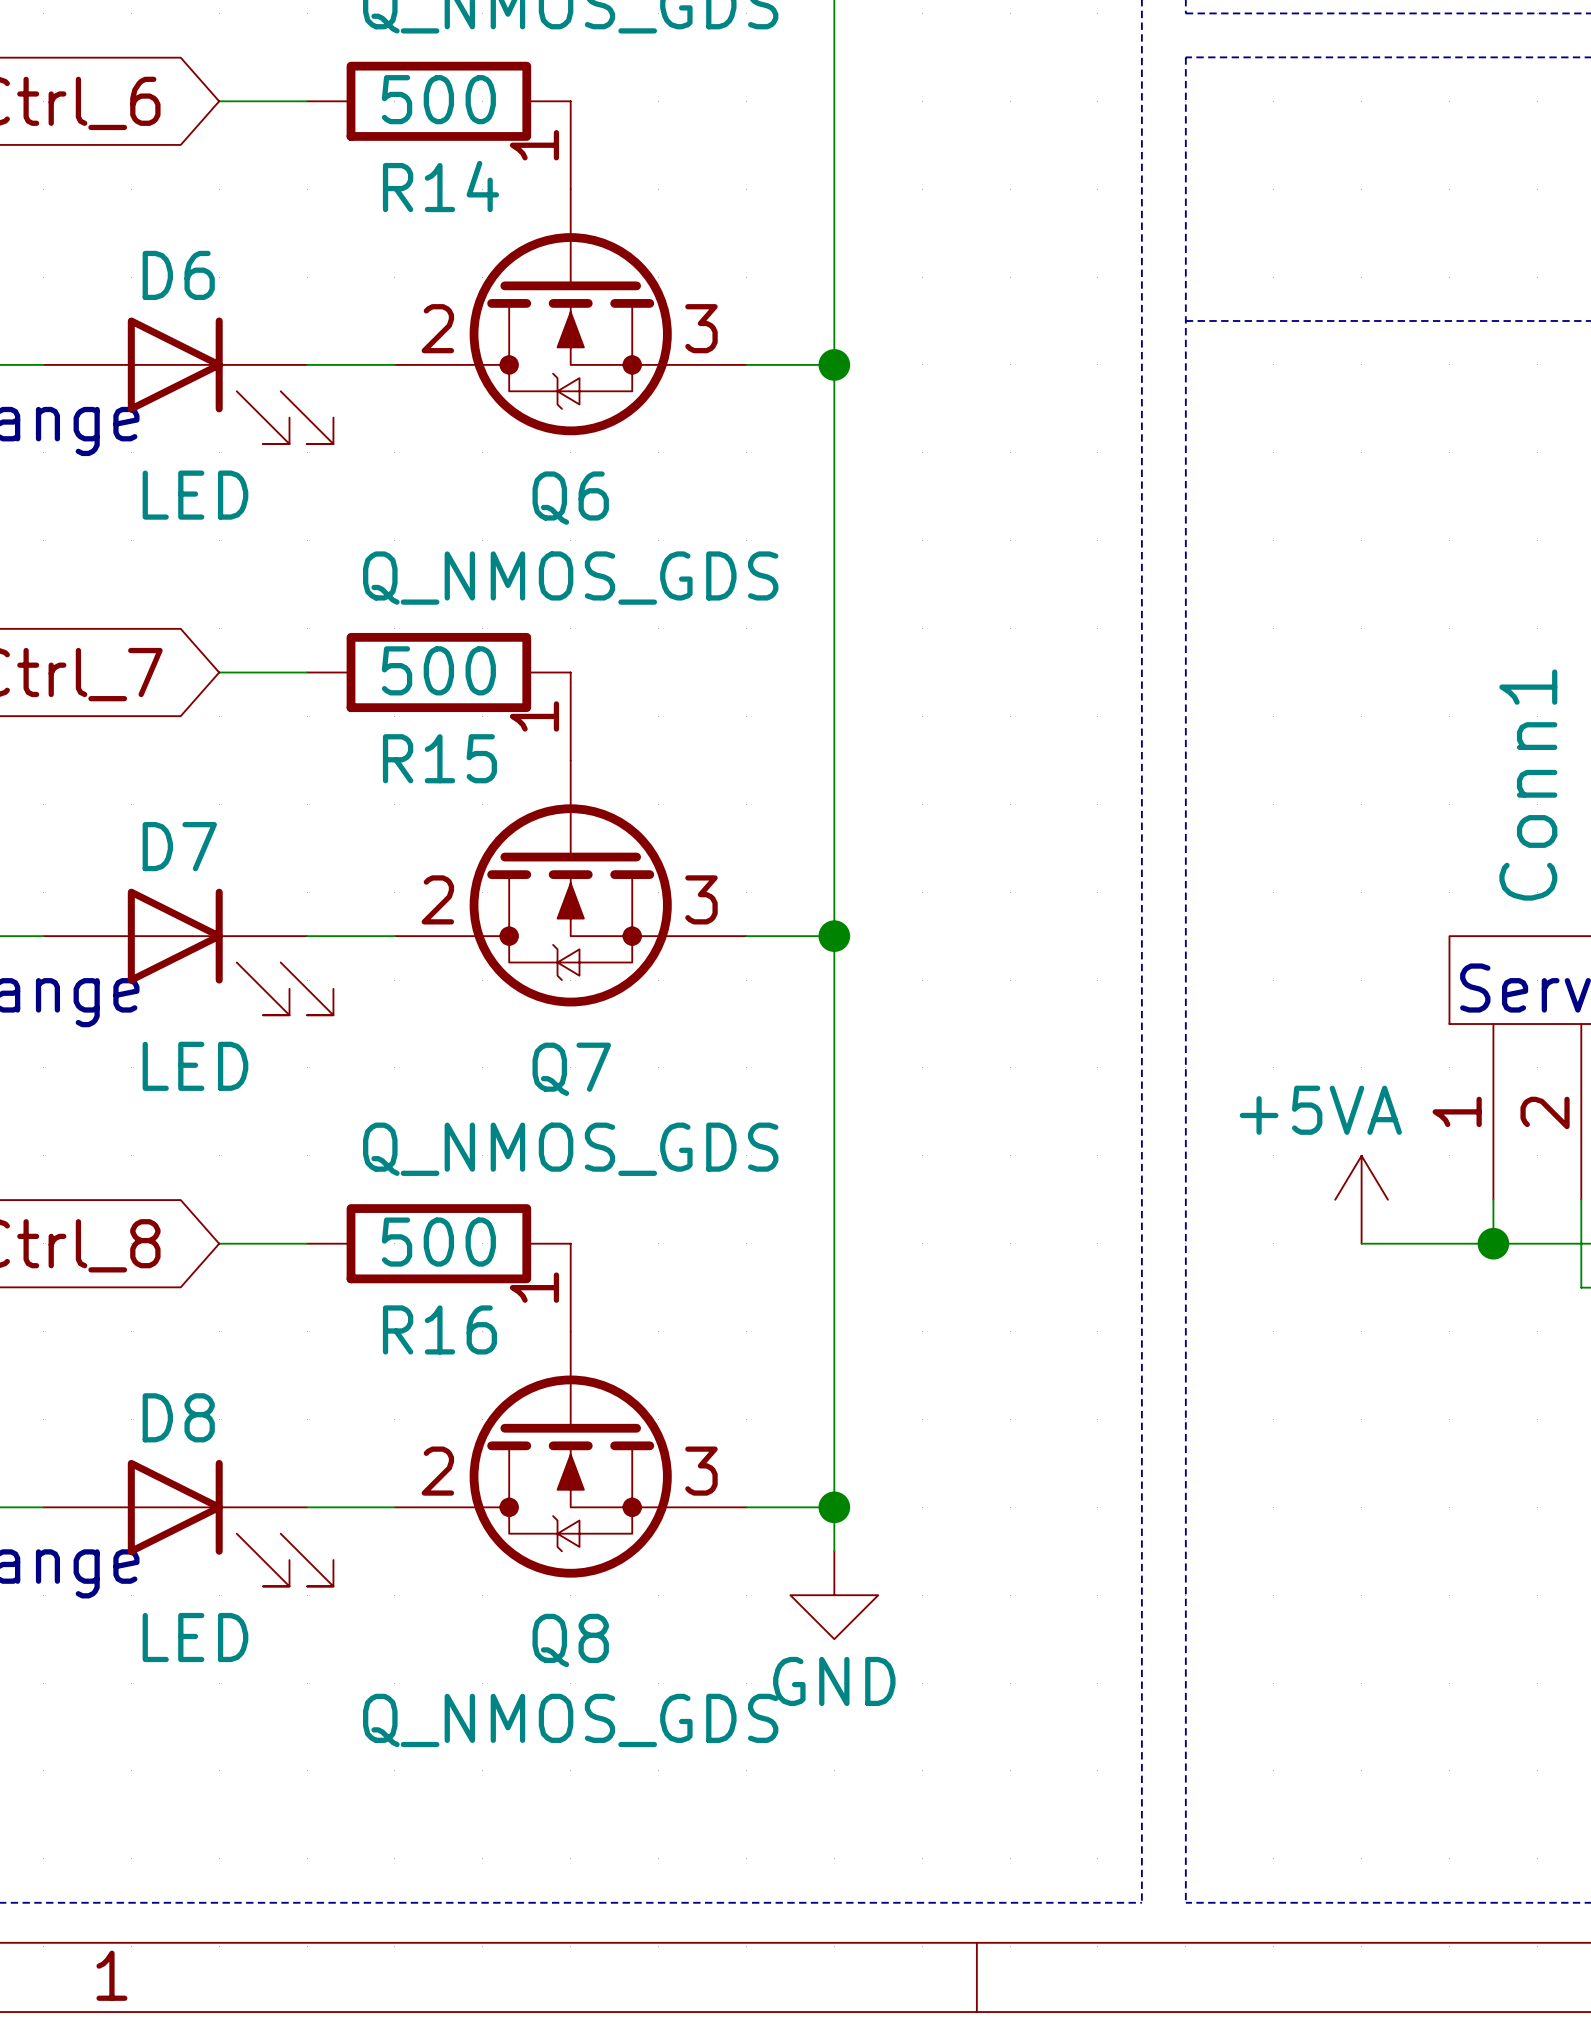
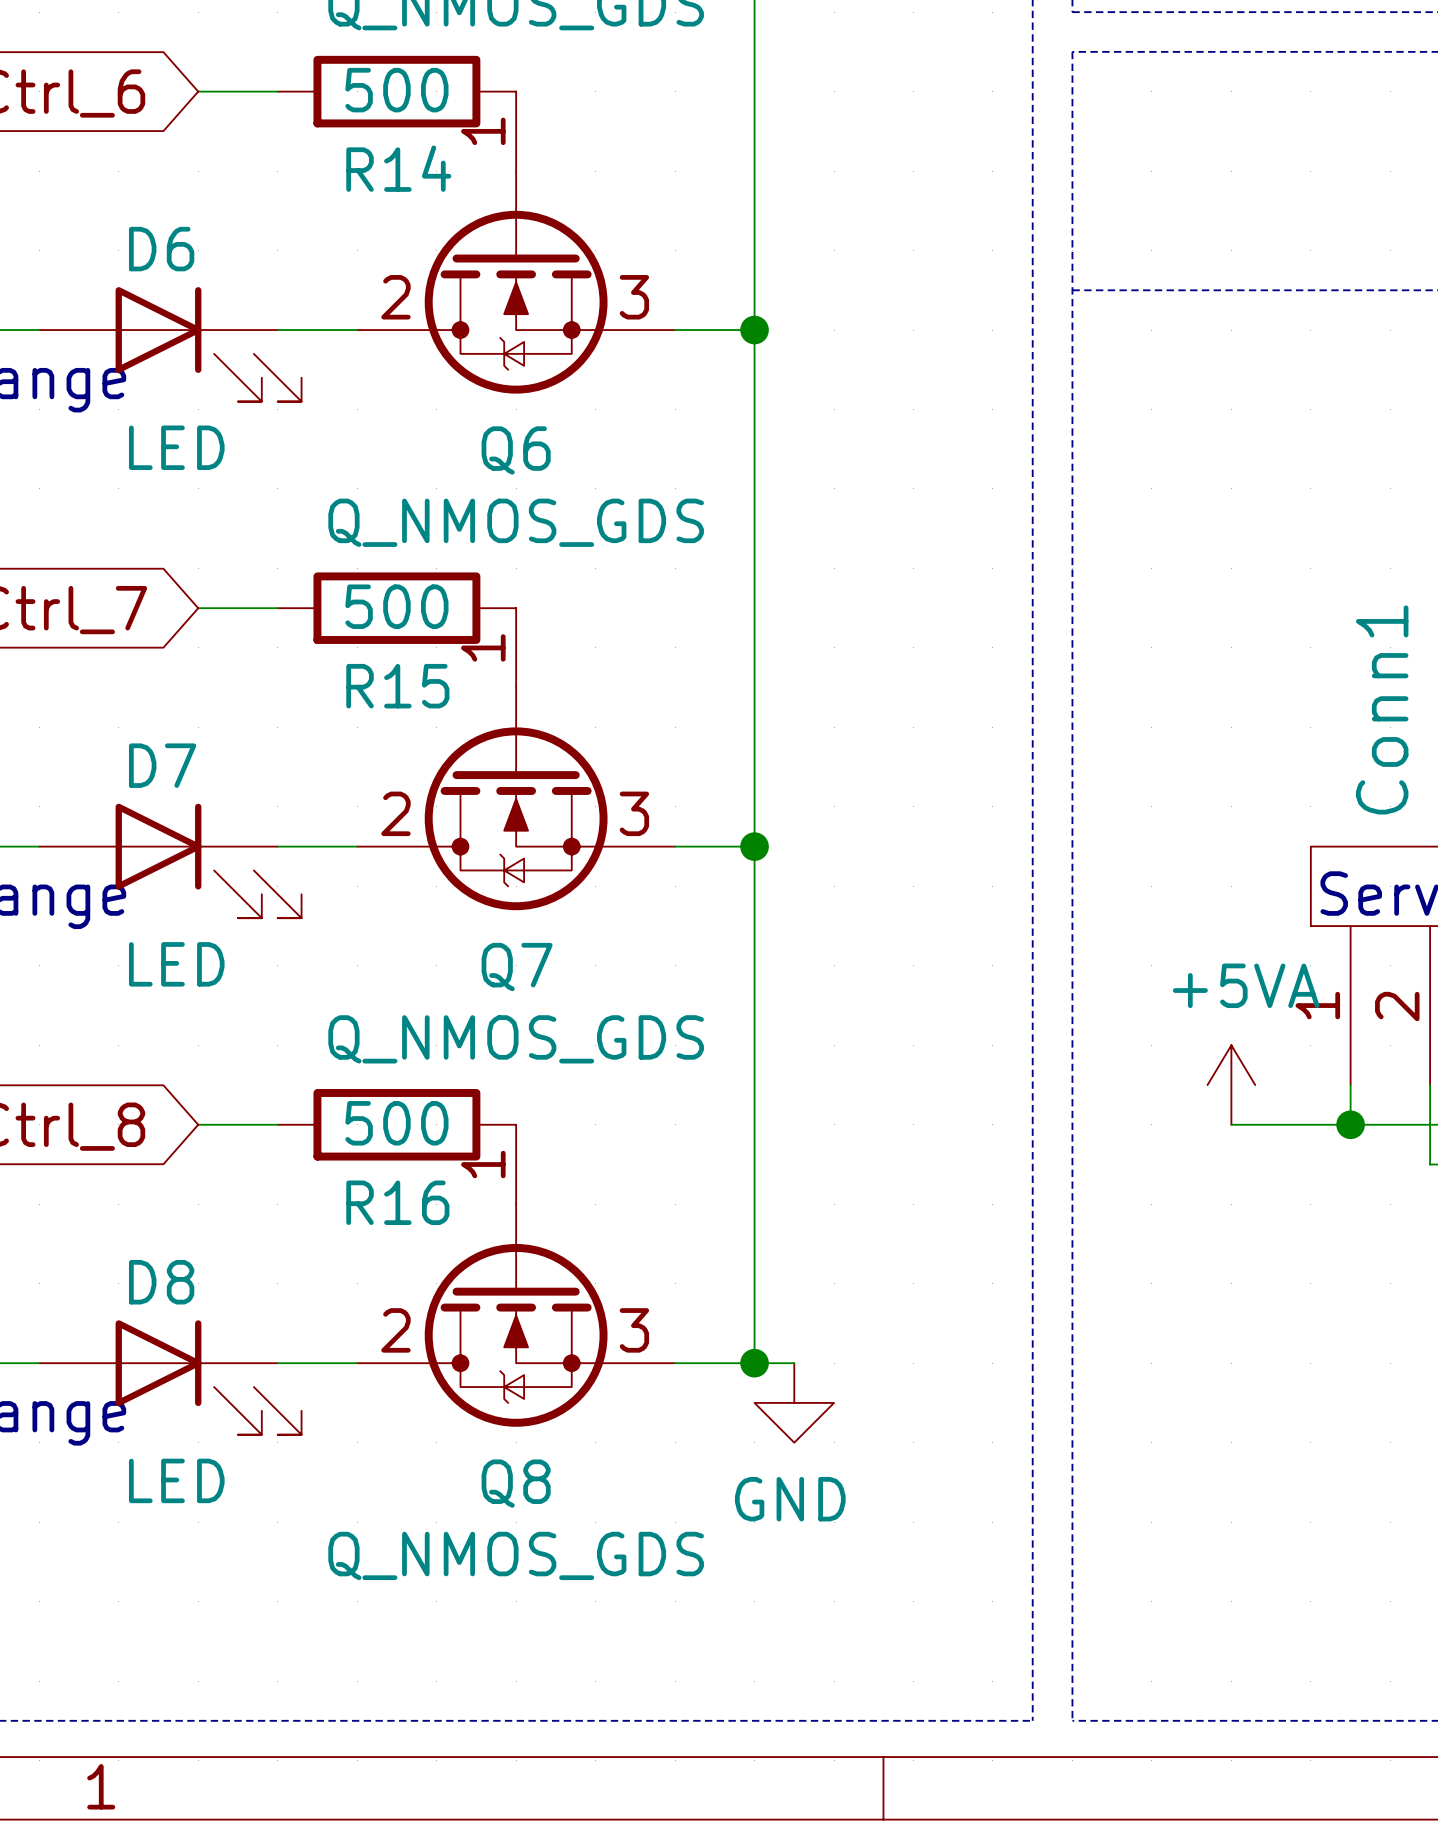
power symbol text position: +5VA (1320, 1110) -> +5VA (1246, 985)
wire: (834, 1507) (834, 1551) -> (754, 1363) (794, 1363)
power symbol position: GND (834, 1595) -> GND (794, 1402)
power symbol text position: GND (834, 1681) -> GND (790, 1499)

